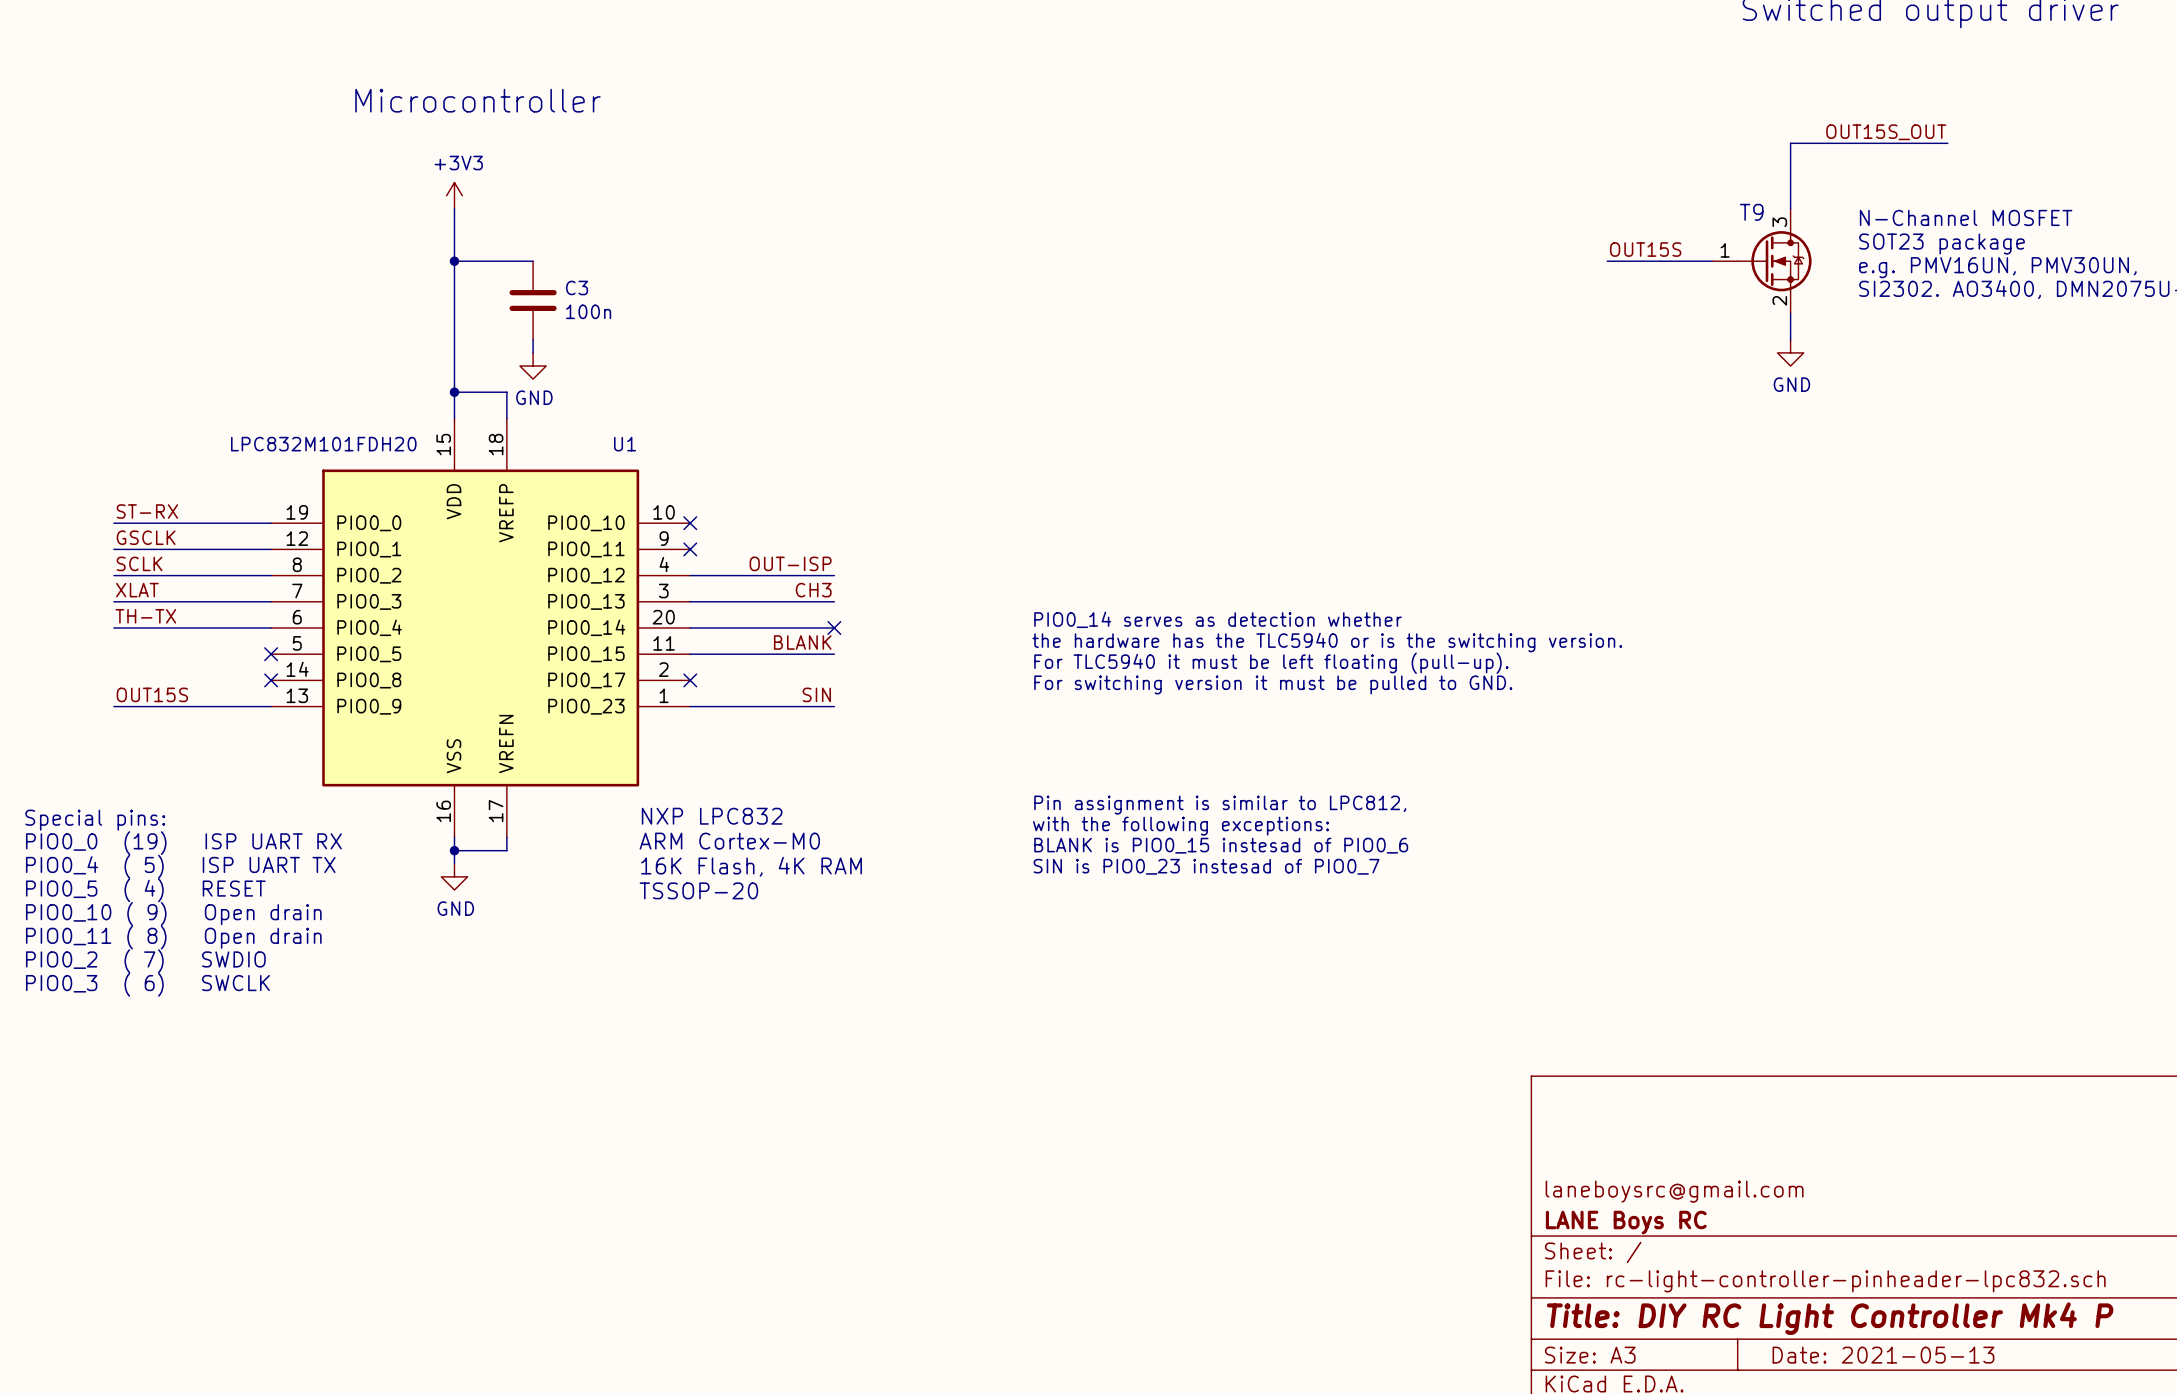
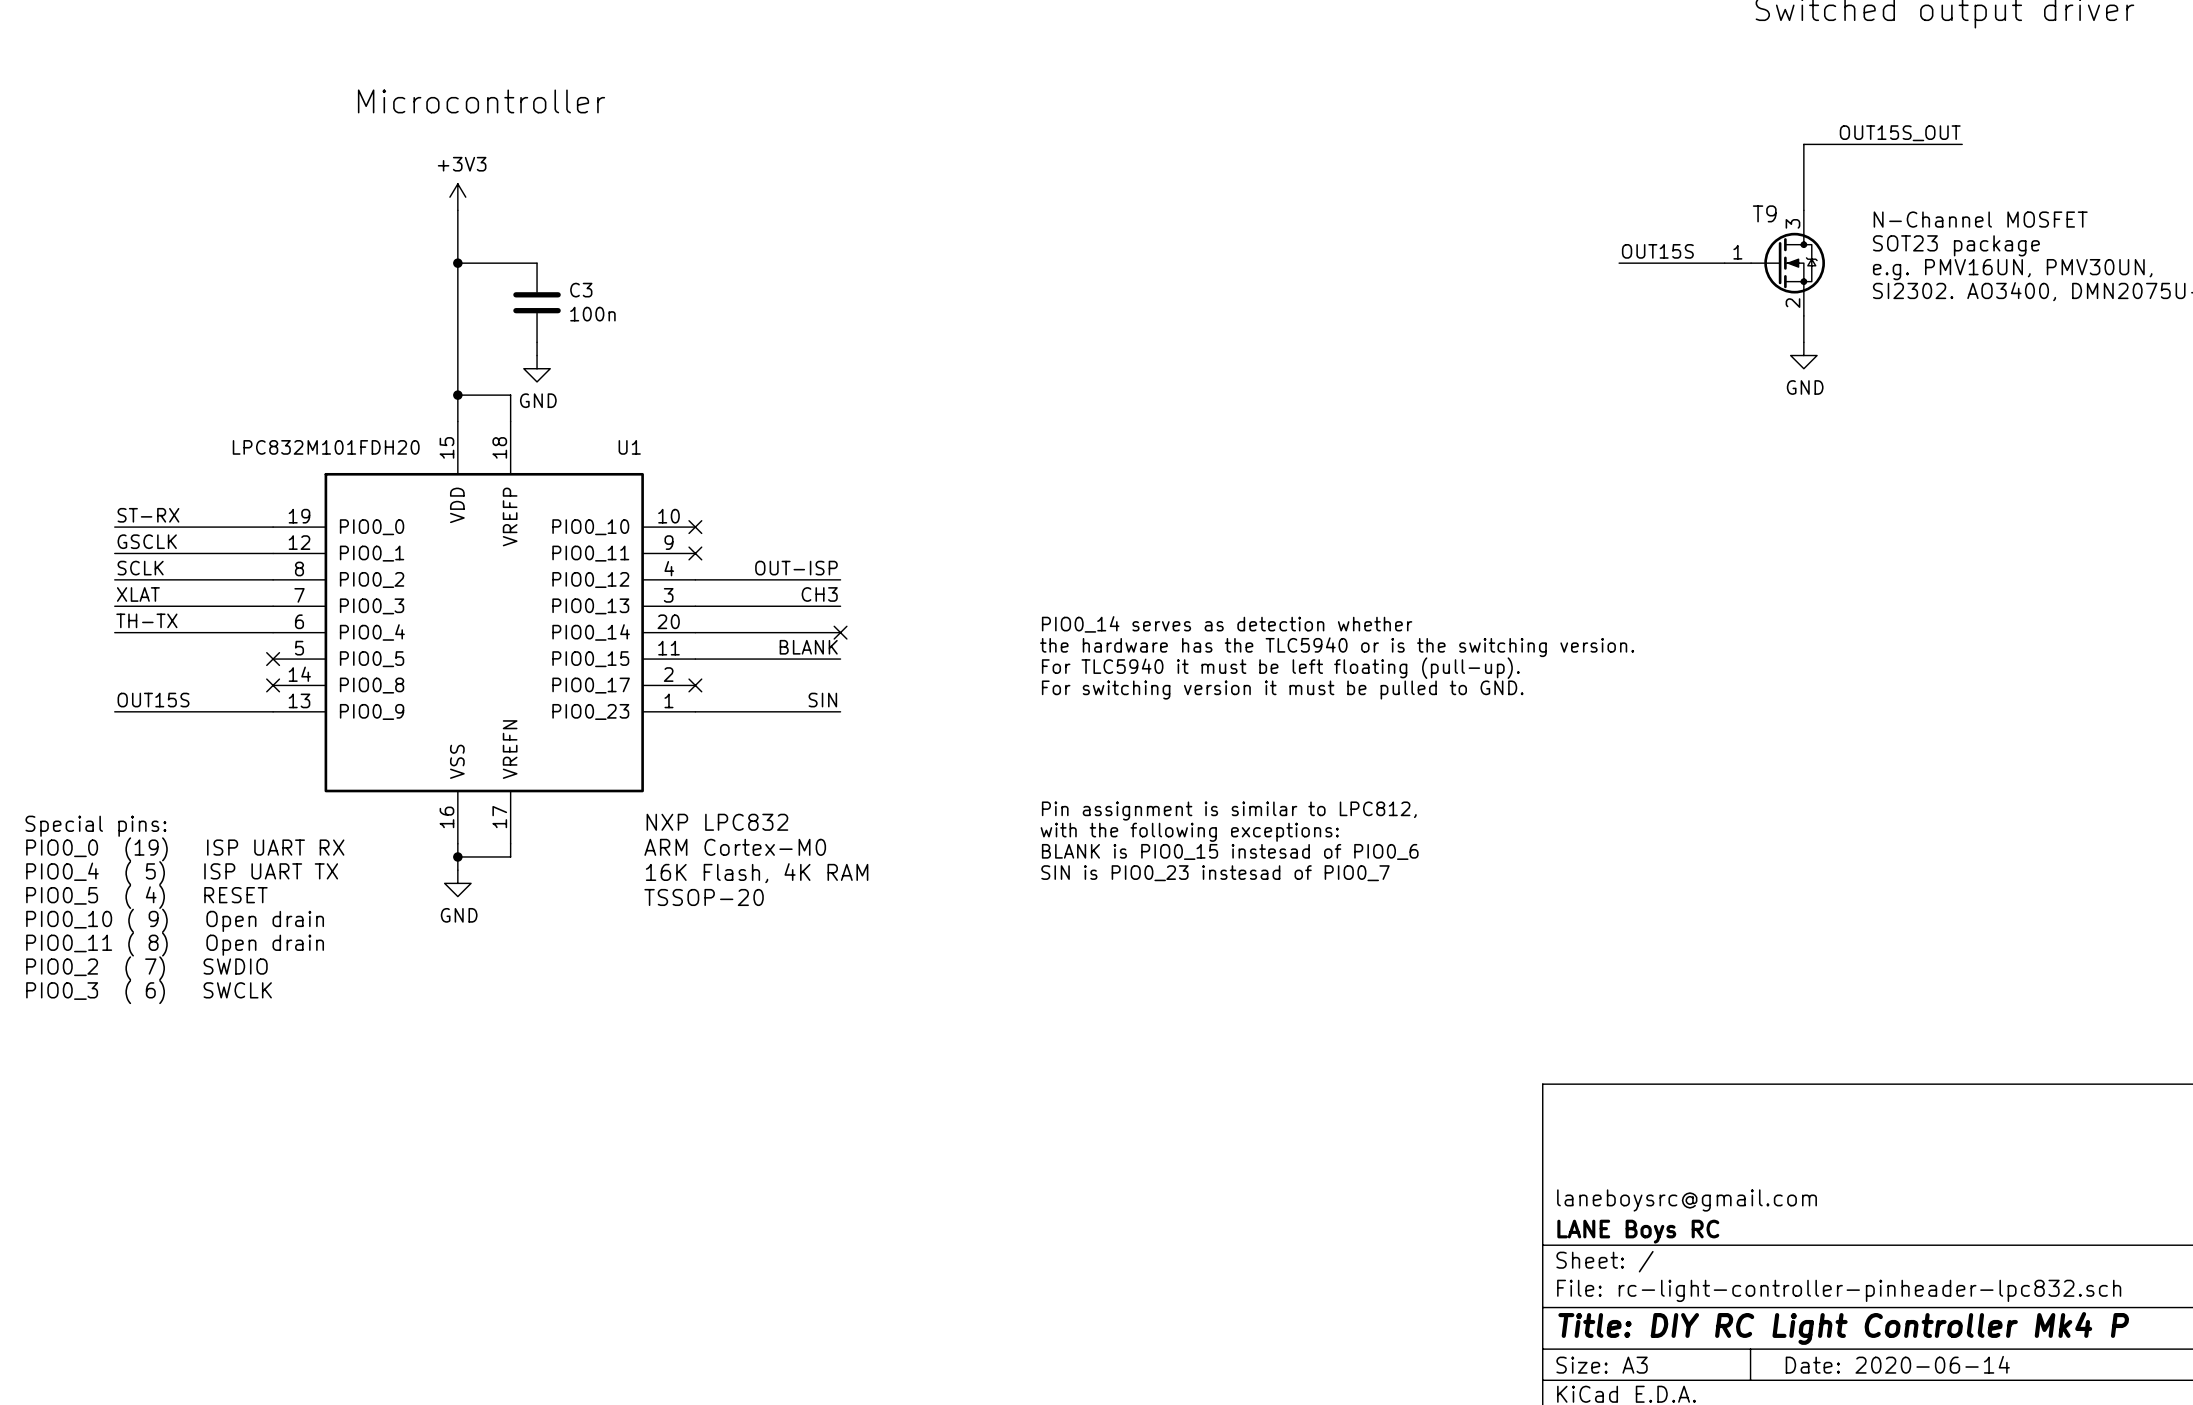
title block: Date: 2021-05-13 (1883, 1355) -> Date: 2020-06-14 (1897, 1364)

